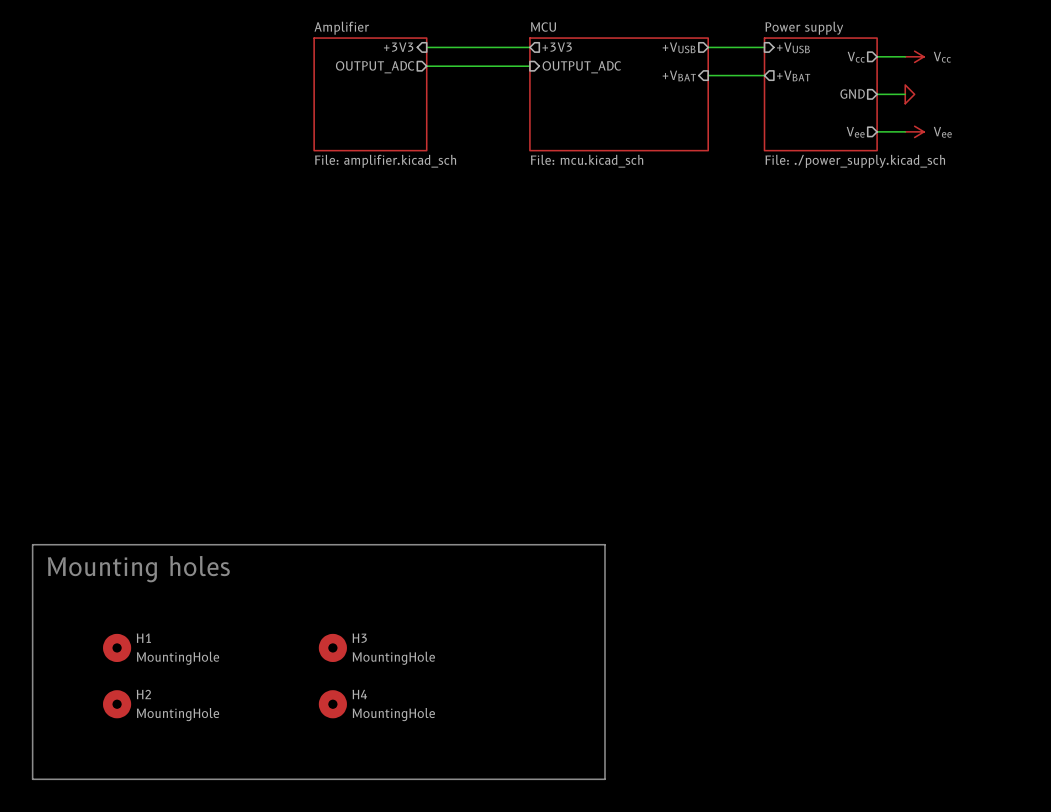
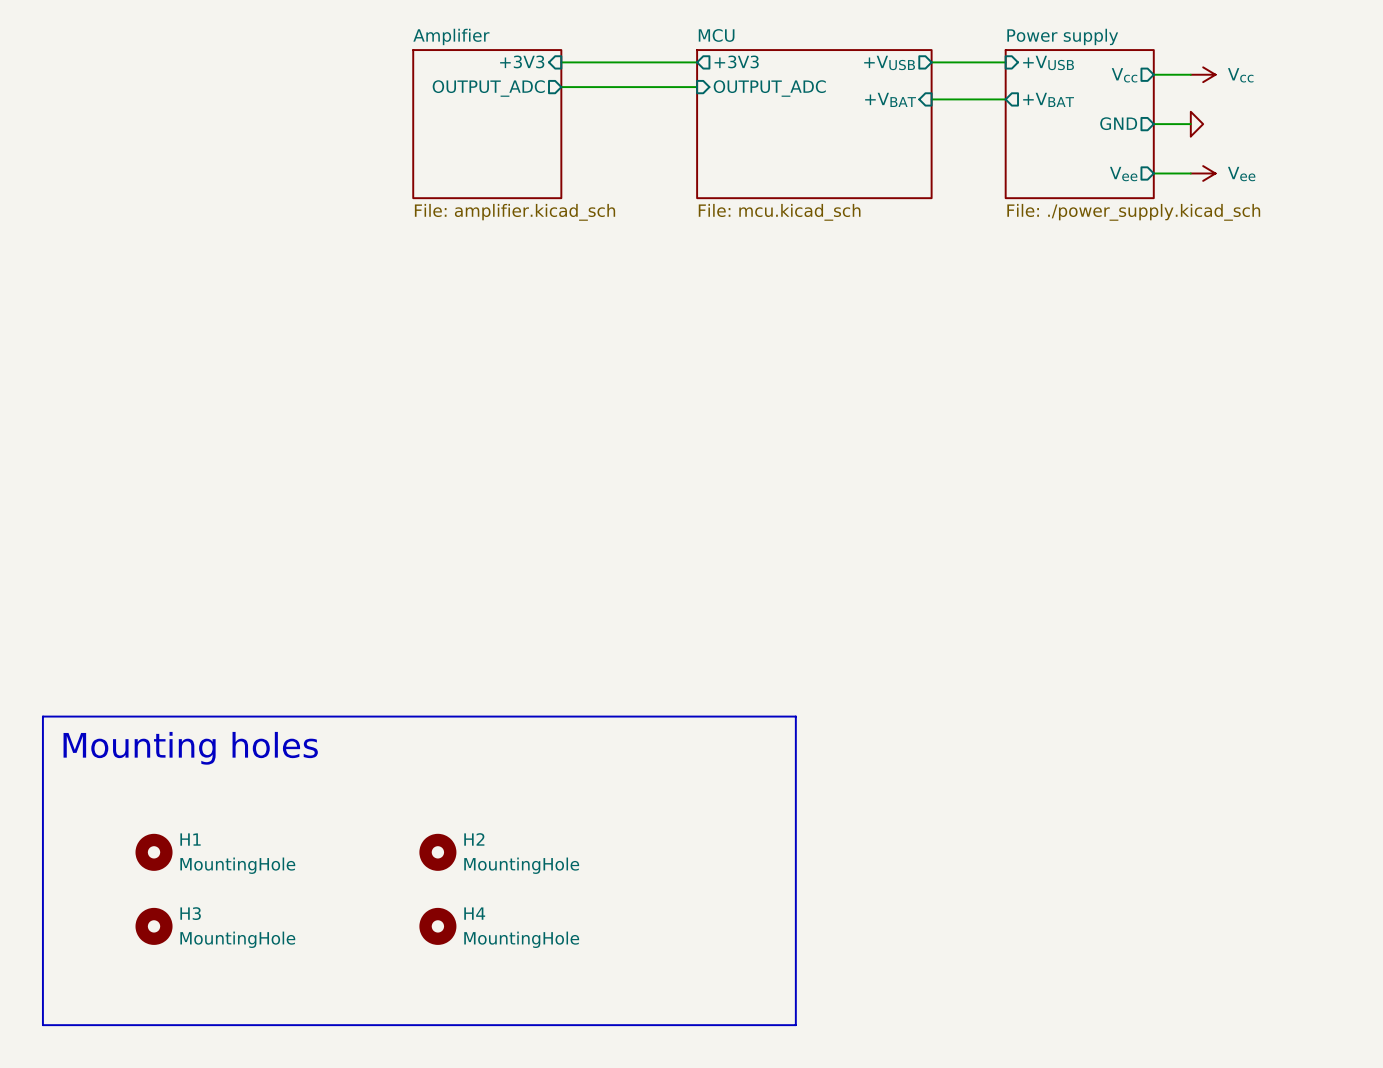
H3 name: H3 (359, 638) -> H2 (474, 839)
H2 name: H2 (143, 694) -> H3 (190, 913)

